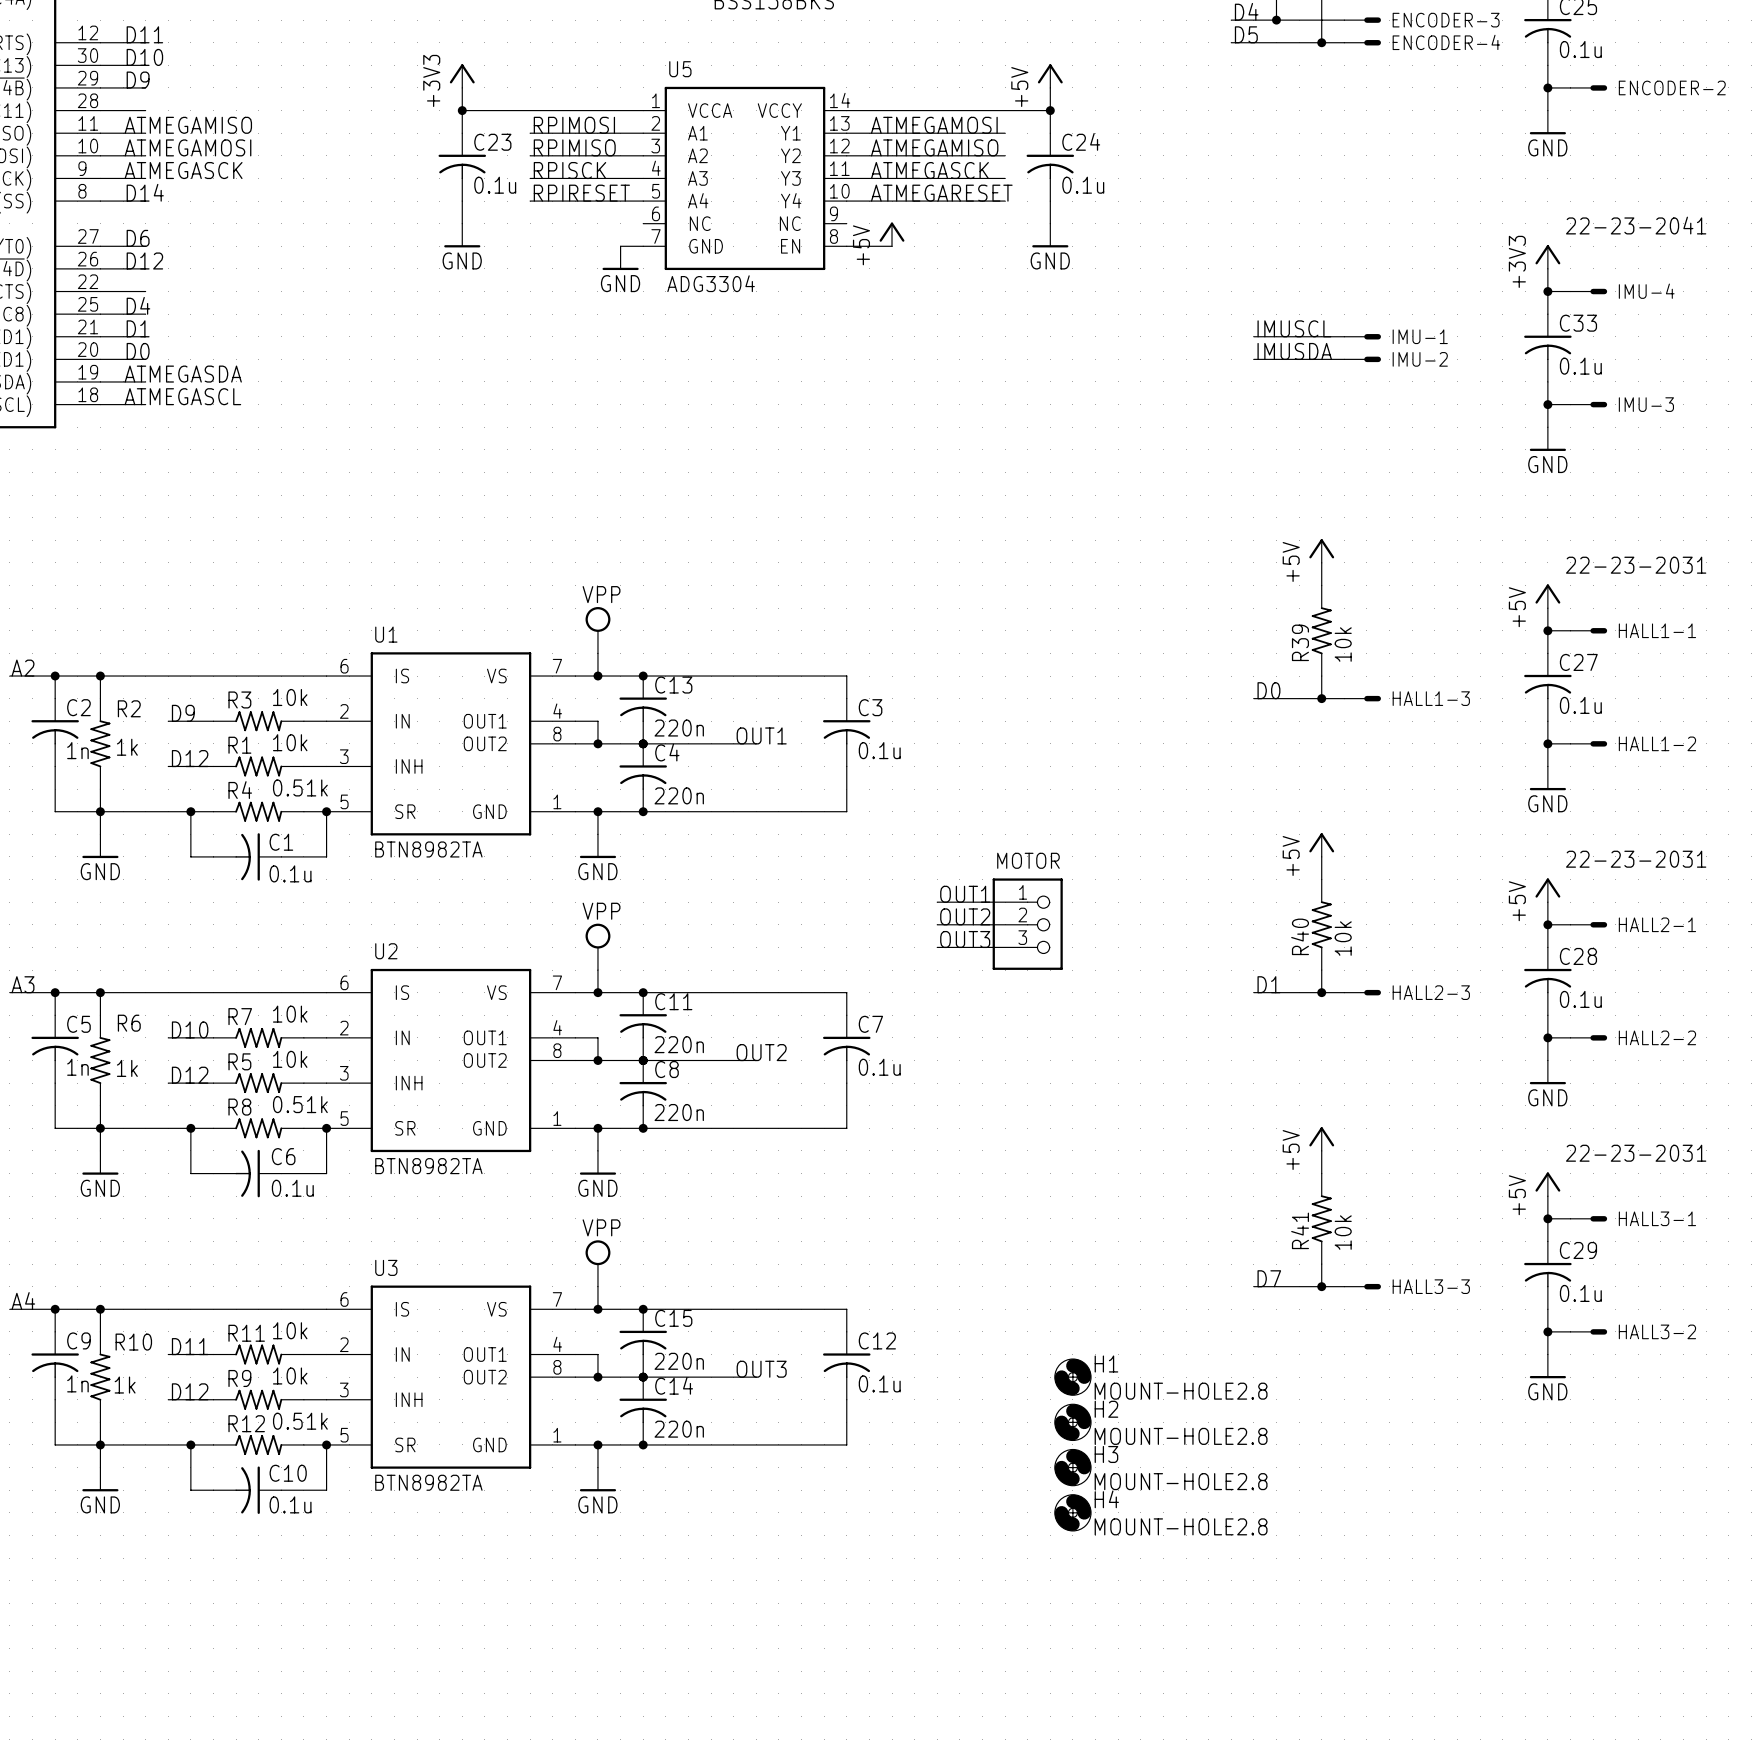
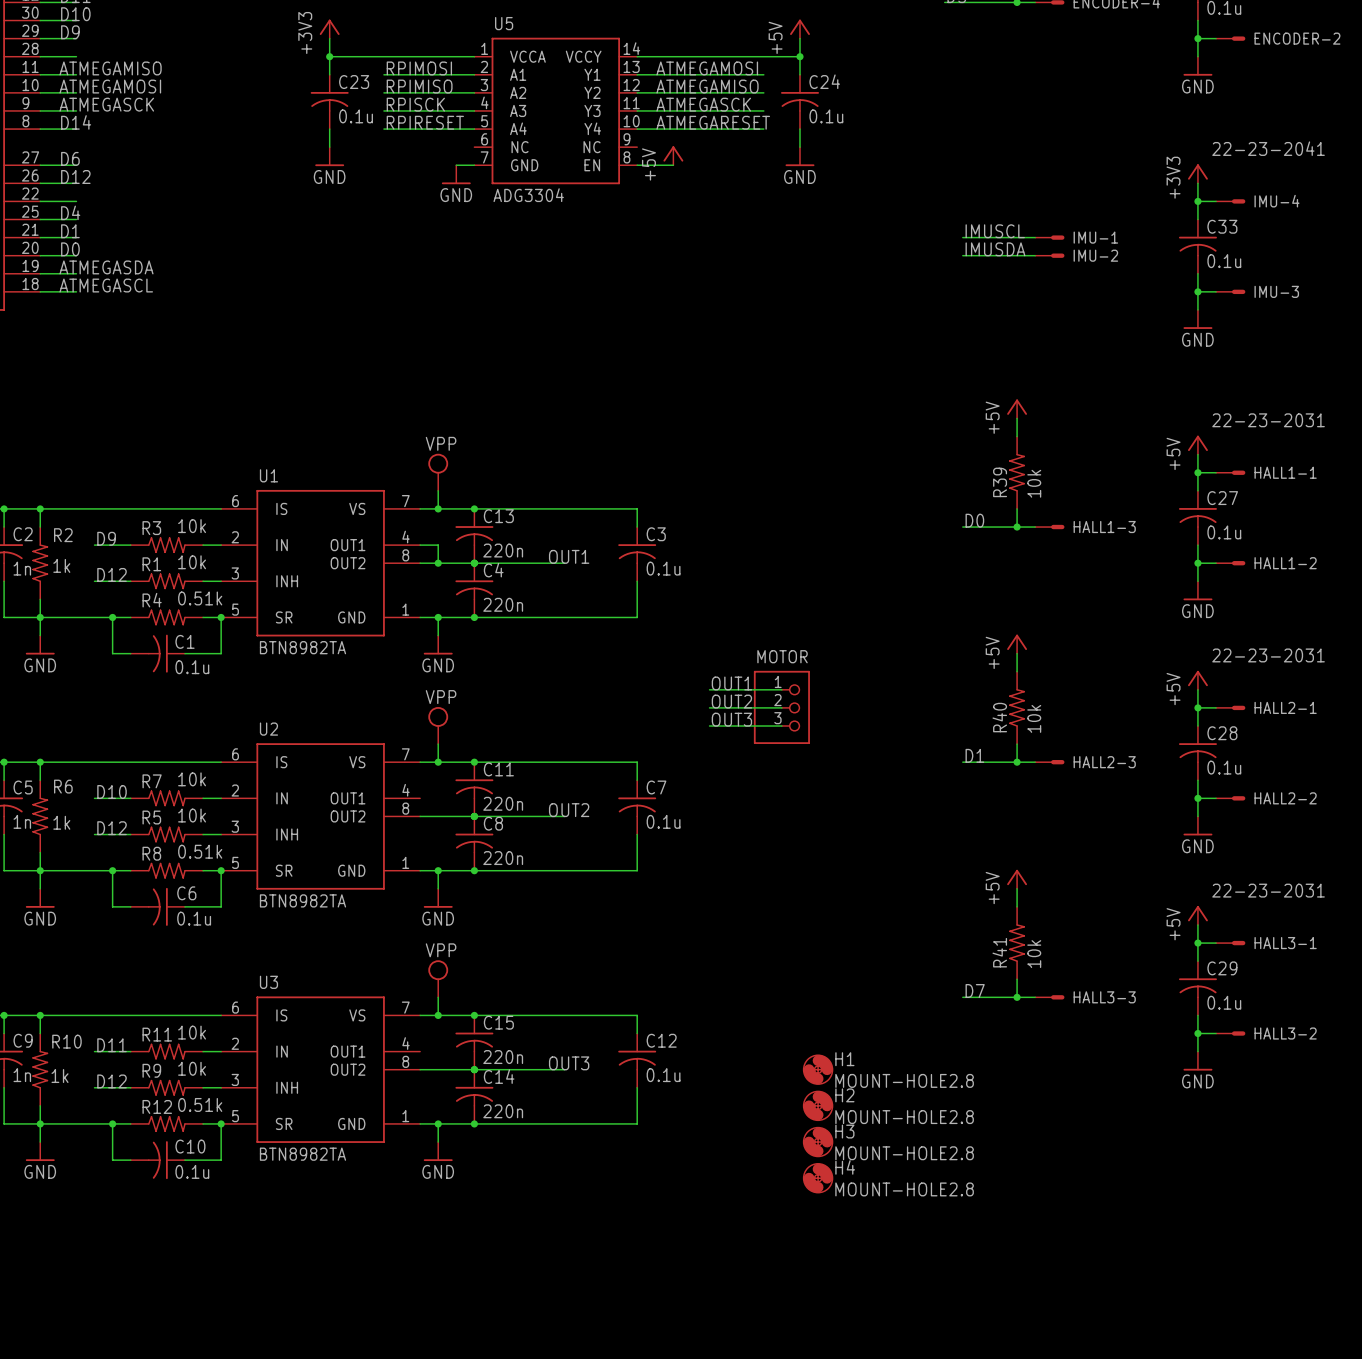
wire: (575, 1037) (597, 1037) (597, 1060) -> none
junction: (597, 1060) -> none
wire: (575, 1354) (597, 1354) (597, 1377) -> none
junction: (597, 1377) -> none

